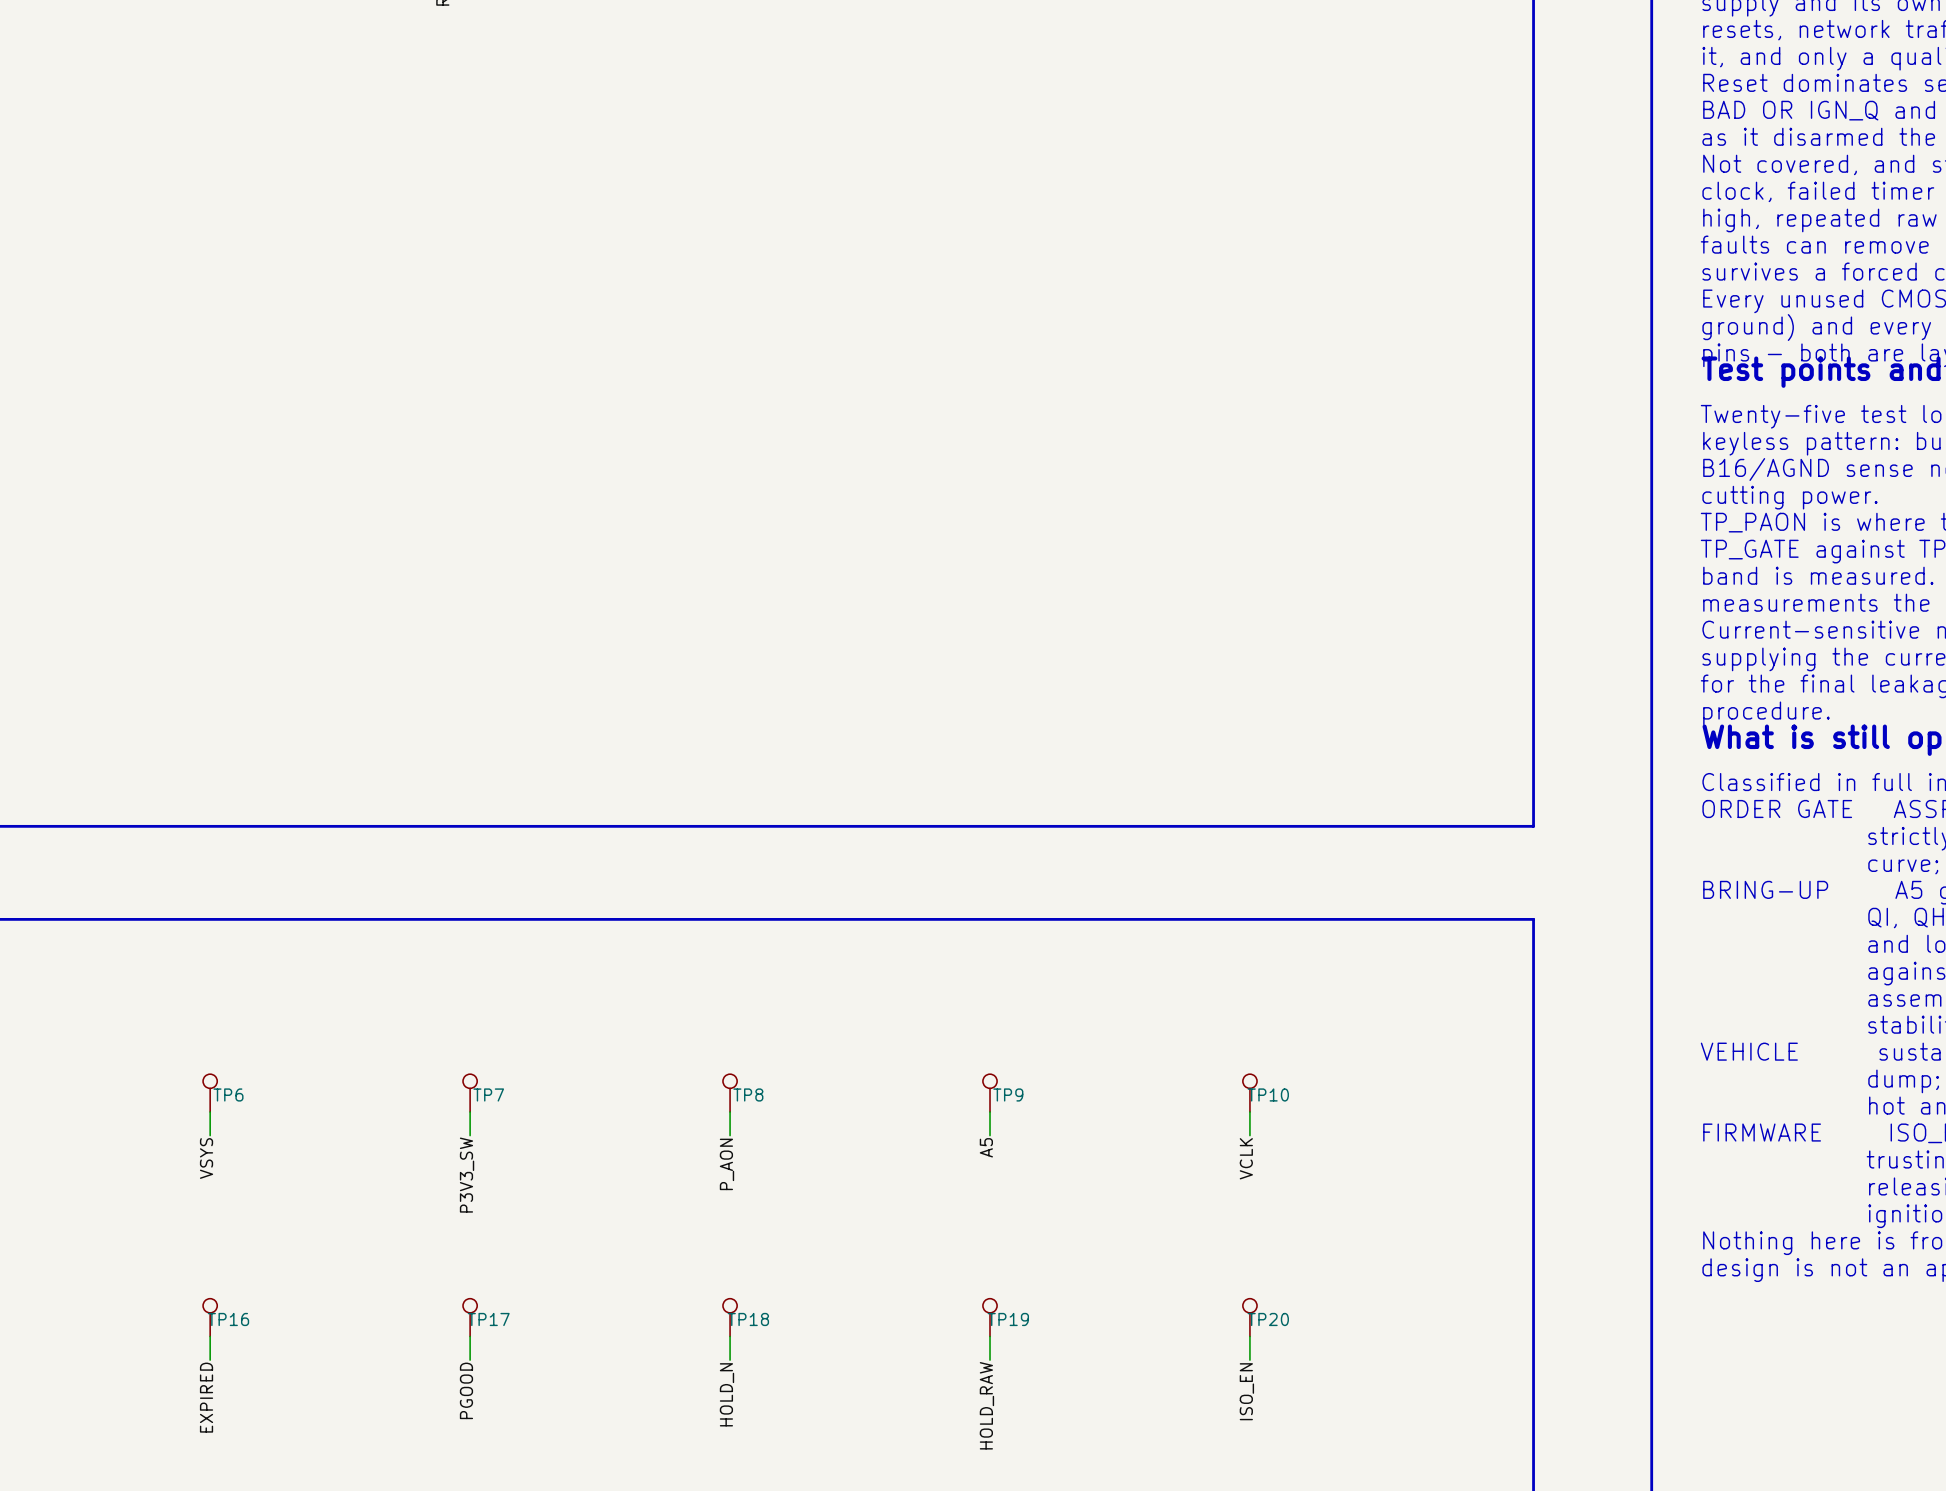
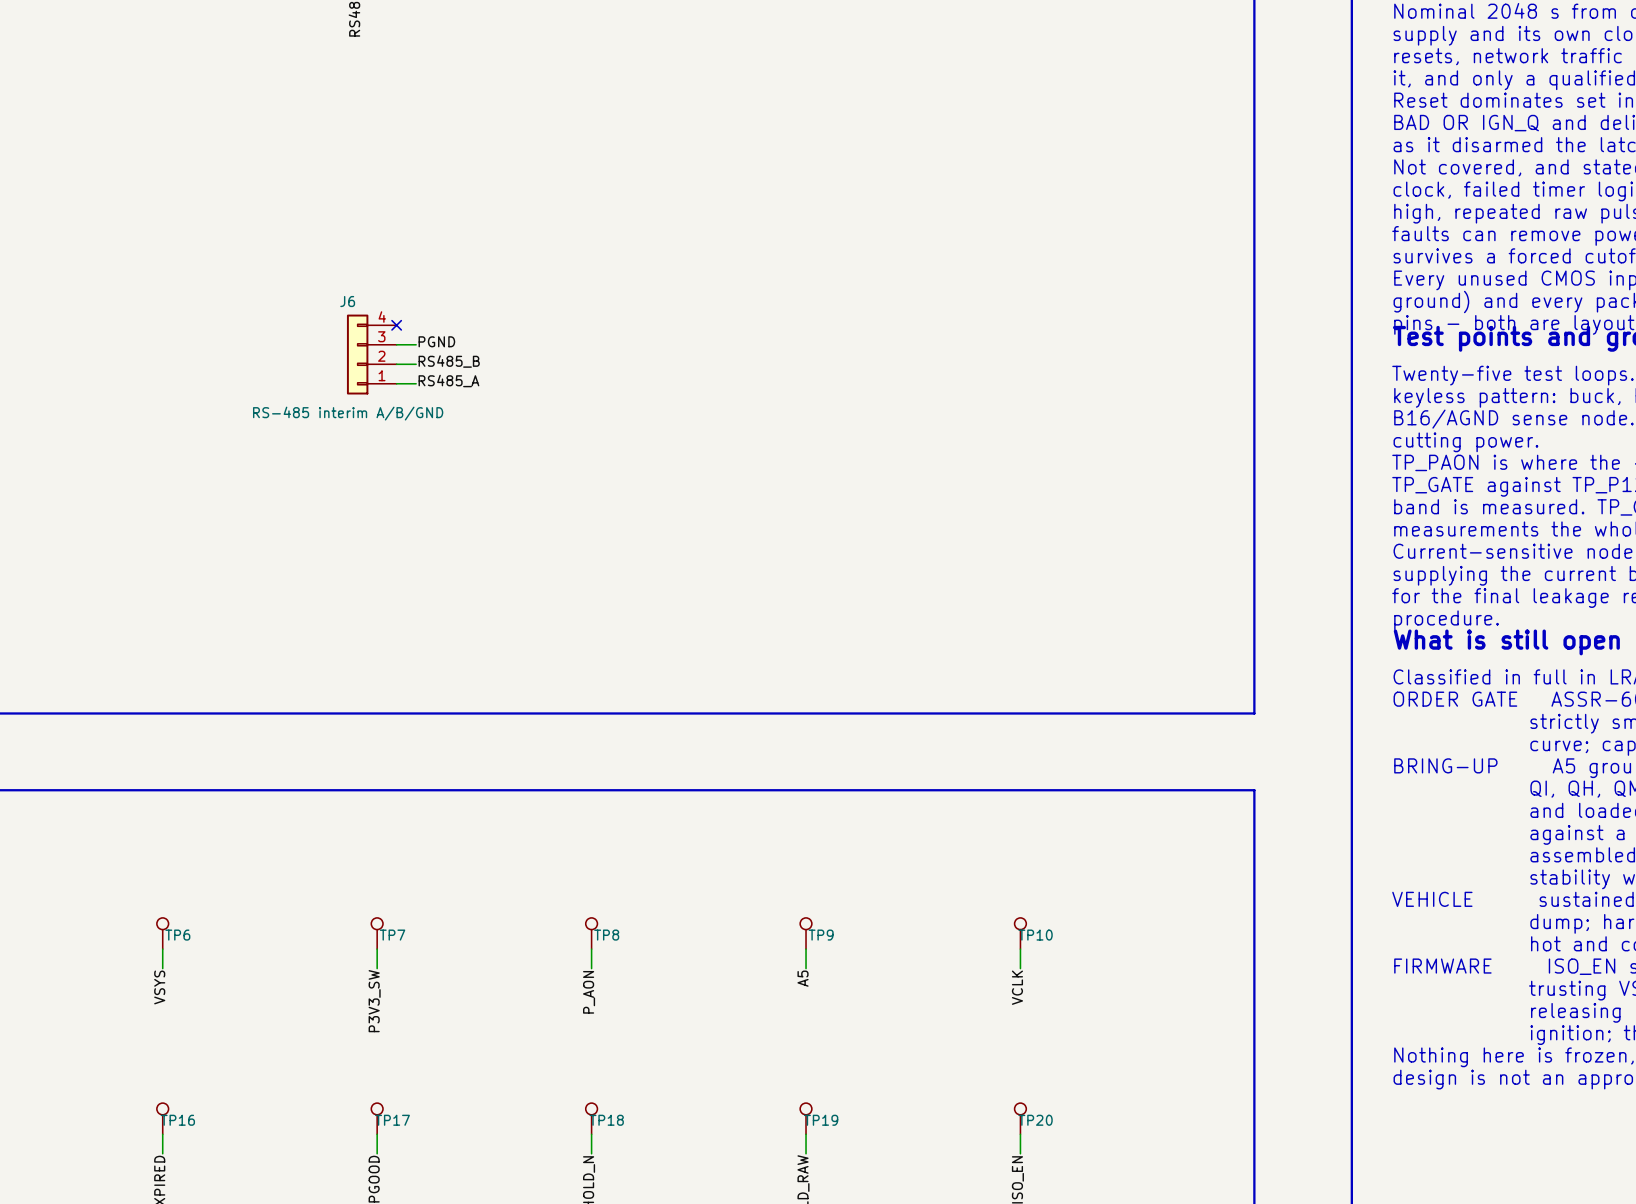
no-connect mark: none -> (396, 325)
label: none -> PGND (436, 341)
wire: none -> (396, 344) (416, 344)
J6: none -> RS-485 interim A/B/GND (371, 354)
label: none -> RS485_B (449, 361)
wire: none -> (396, 364) (416, 364)
label: none -> RS485_A (448, 381)
wire: none -> (396, 383) (416, 383)

